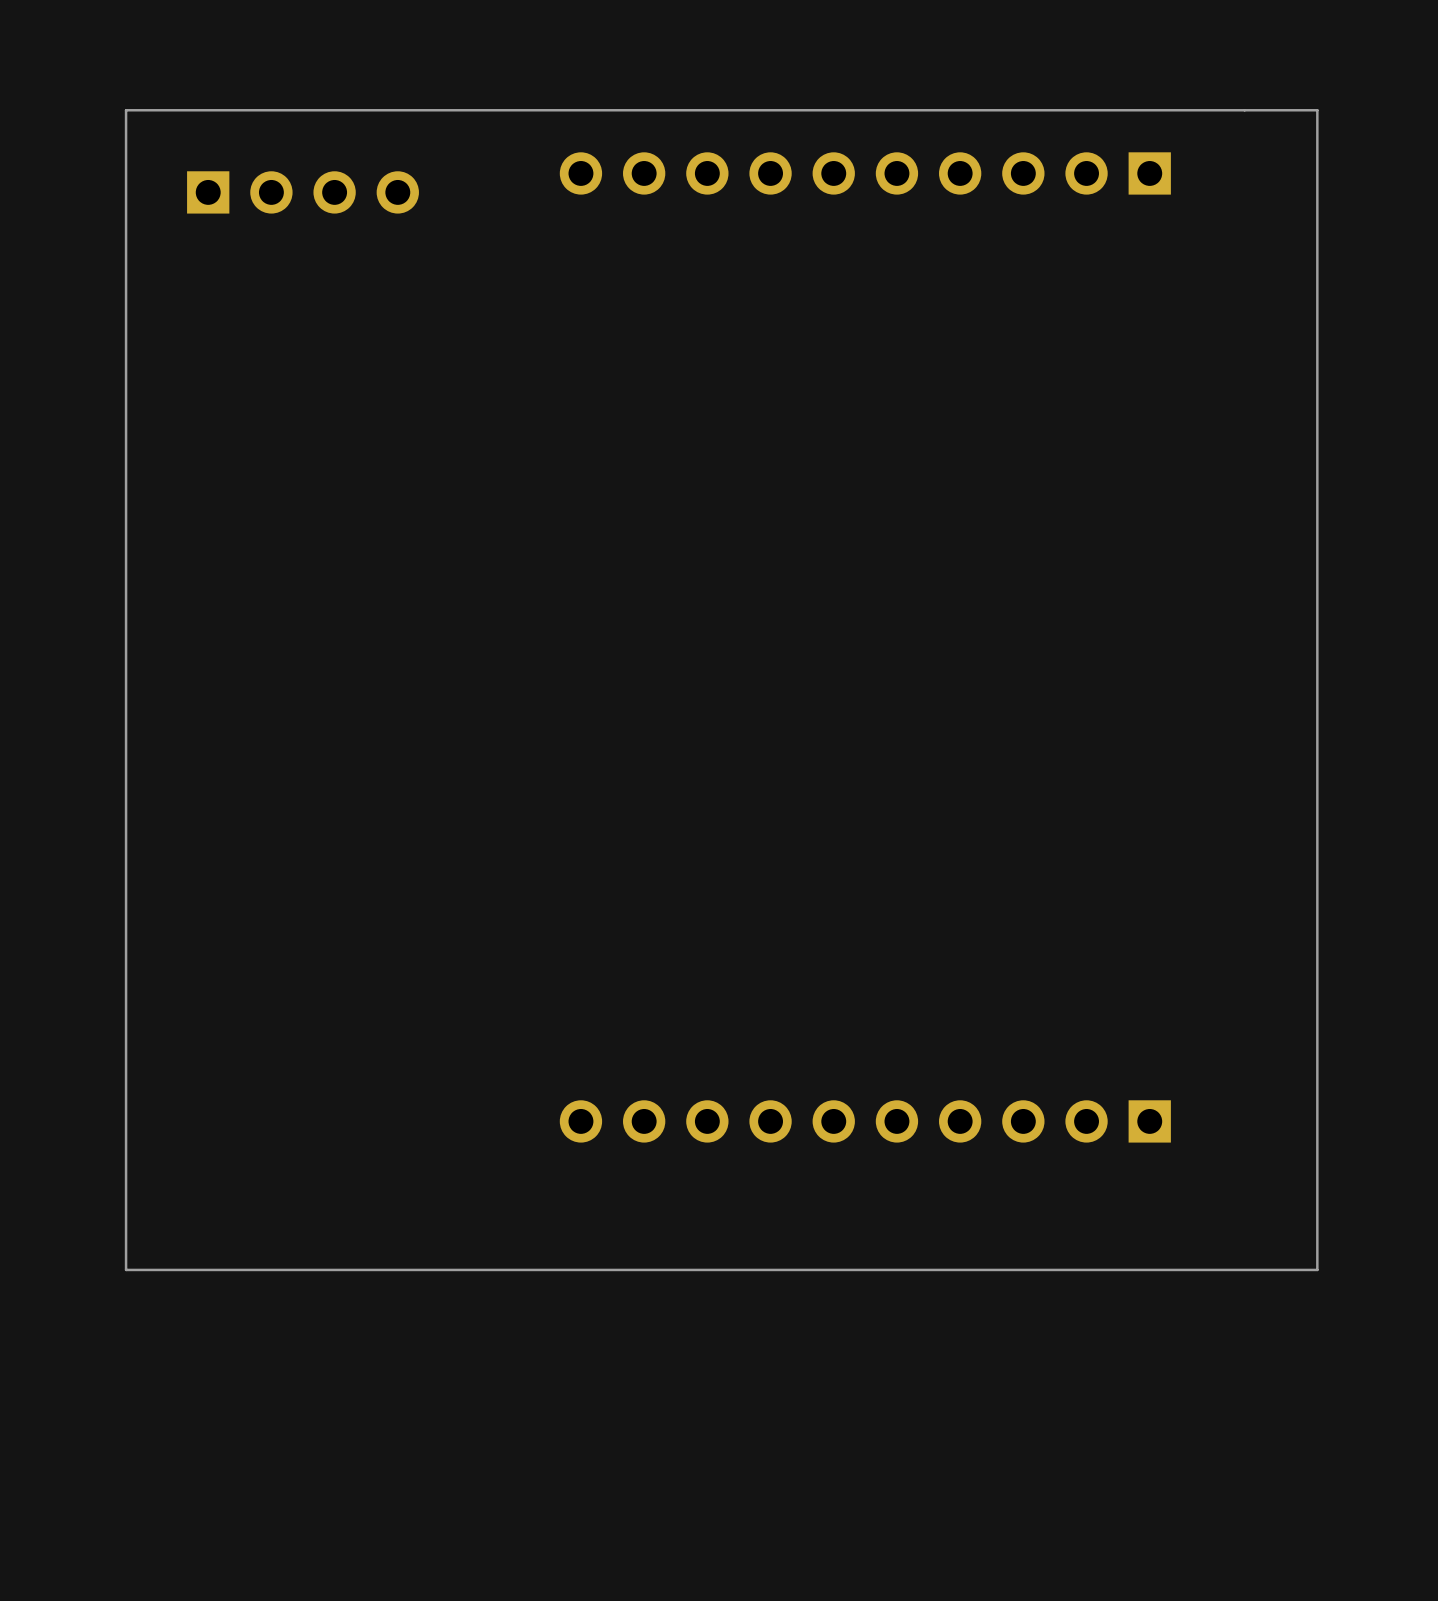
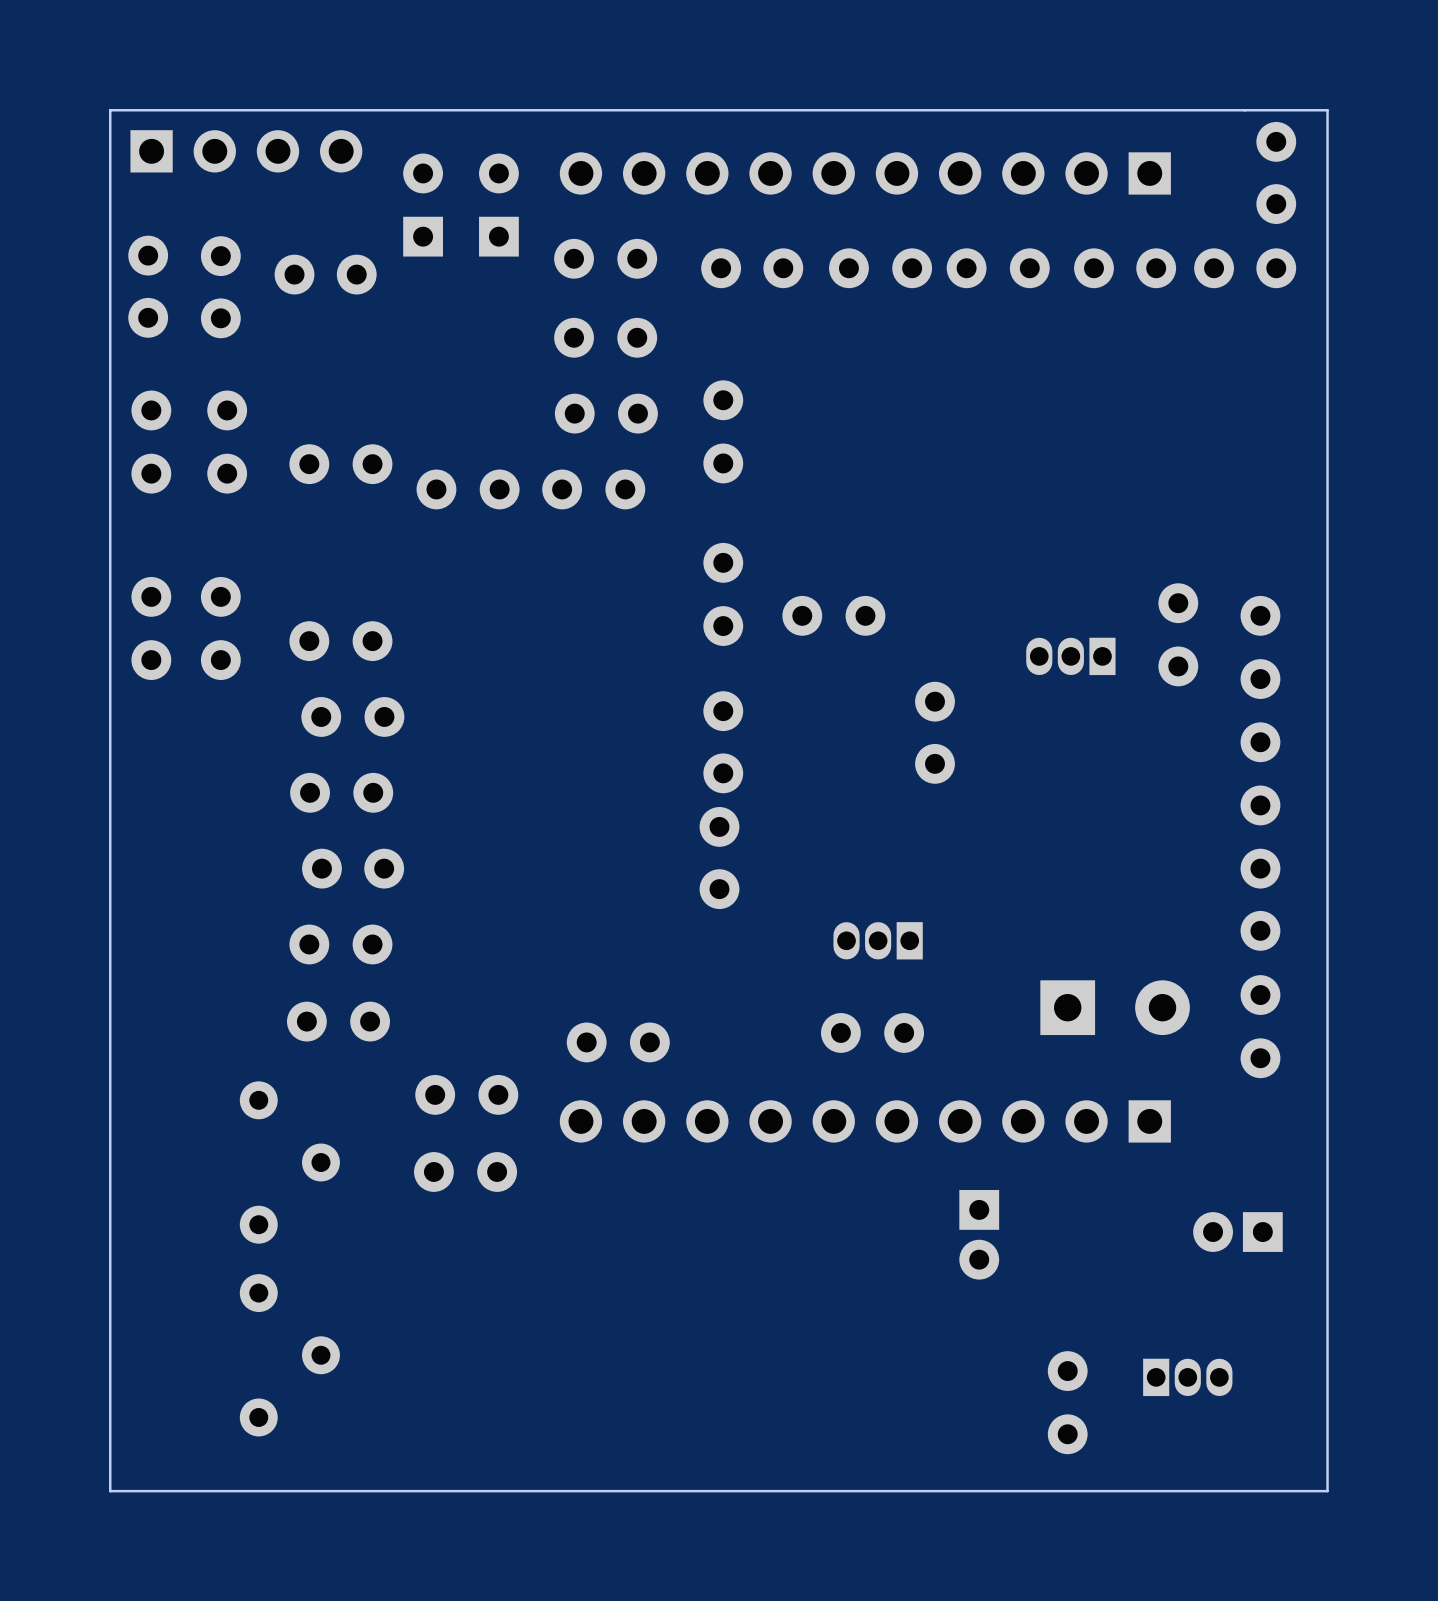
board edge: (1317, 110) (1317, 1269) (126, 1269) (126, 110) -> (1317, 110) (1327, 110) (1327, 1491) (110, 1491) (110, 110) (126, 110)
part: none -> (1276, 172)
part position: (303, 192) -> (246, 151)
part: none -> (423, 205)
part: none -> (498, 205)
part: none -> (605, 258)
part: none -> (752, 268)
part: none -> (880, 268)
part: none -> (998, 268)
part: none -> (1125, 268)
part: none -> (1245, 268)
part: none -> (325, 274)
part: none -> (148, 286)
part: none -> (220, 287)
part: none -> (605, 337)
part: none -> (606, 413)
part: none -> (723, 431)
part: none -> (151, 442)
part: none -> (227, 442)
part: none -> (340, 464)
part: none -> (468, 489)
part: none -> (593, 489)
part: none -> (723, 594)
part: none -> (833, 615)
part: none -> (151, 628)
part: none -> (220, 628)
part: none -> (1178, 634)
part: none -> (340, 641)
part: none -> (1260, 647)
part: none -> (1070, 656)
part: none -> (352, 716)
part: none -> (934, 732)
part: none -> (723, 742)
part: none -> (1260, 773)
part: none -> (341, 792)
part: none -> (719, 858)
part: none -> (353, 868)
part: none -> (1260, 899)
part: none -> (878, 940)
part: none -> (340, 944)
part: none -> (1115, 1007)
part: none -> (338, 1021)
part: none -> (1260, 1026)
part: none -> (872, 1032)
part: none -> (618, 1042)
part: none -> (466, 1094)
part: none -> (289, 1162)
part: none -> (465, 1171)
part: none -> (1237, 1232)
part: none -> (979, 1234)
part: none -> (289, 1355)
part: none -> (1187, 1377)
part: none -> (1067, 1402)

